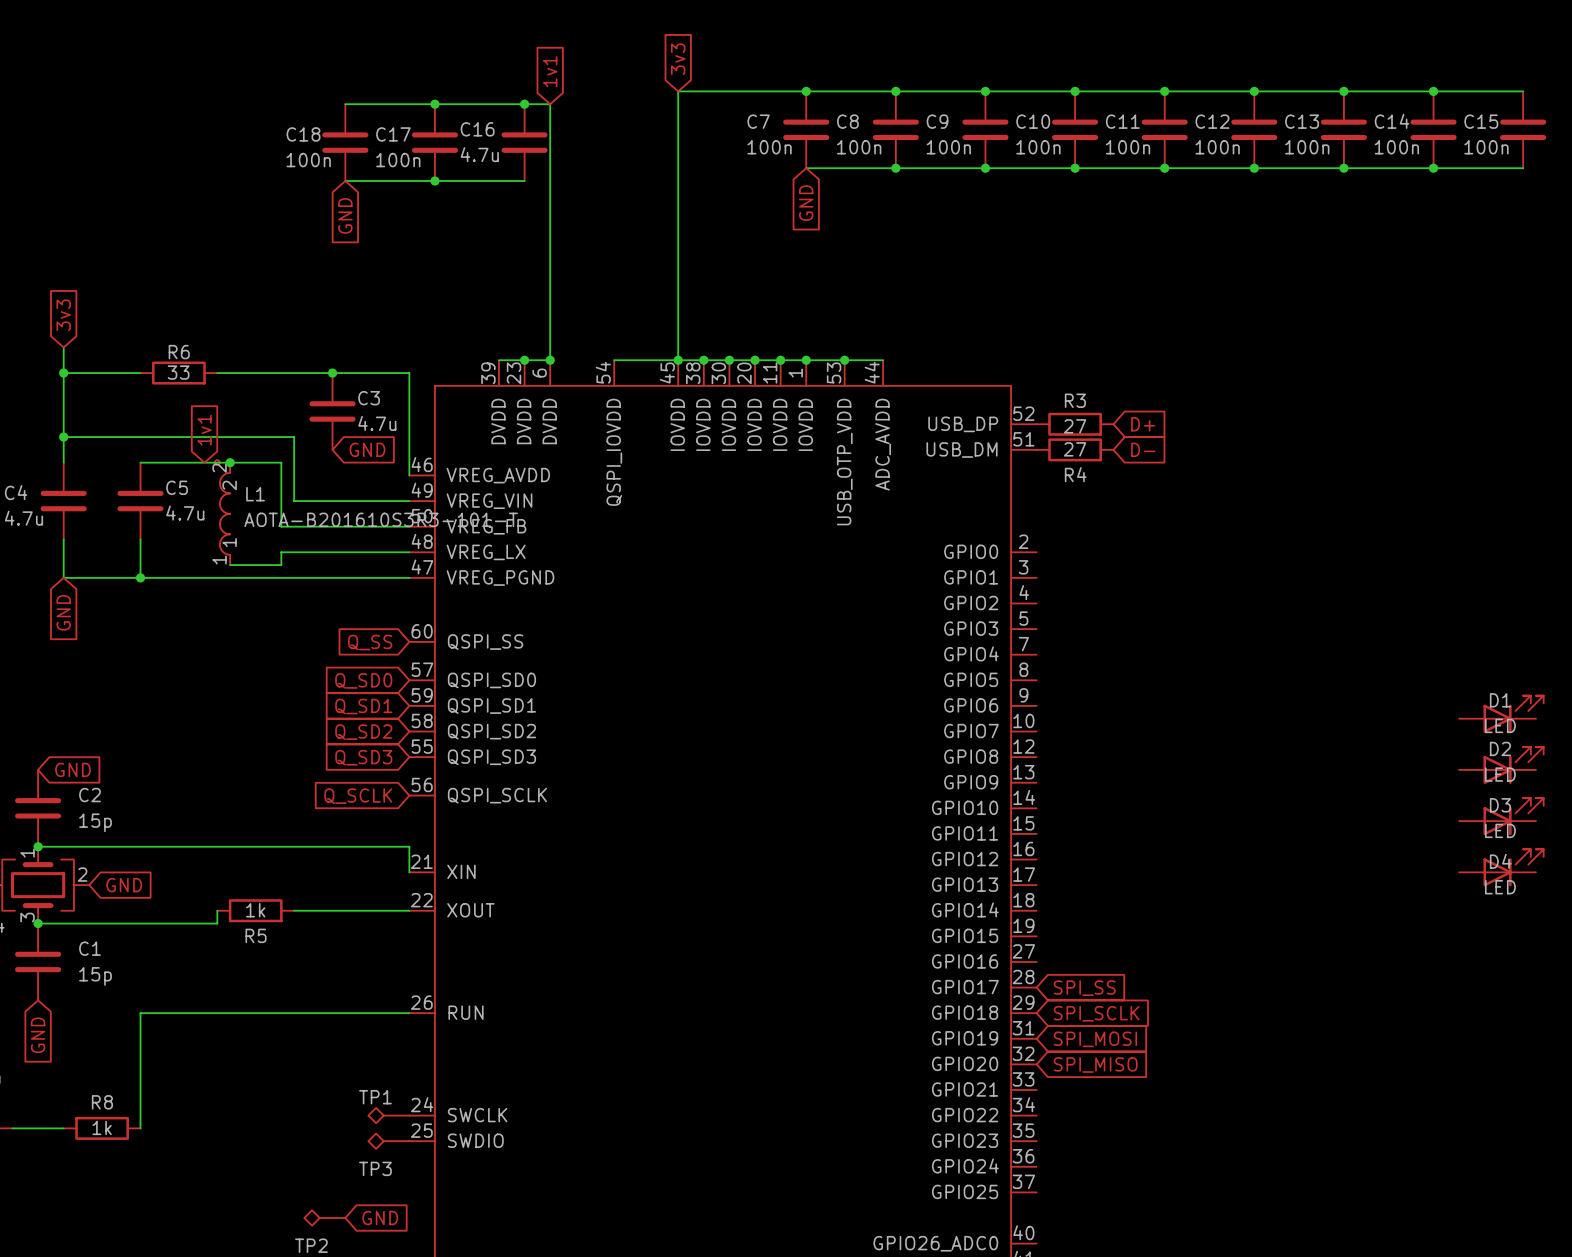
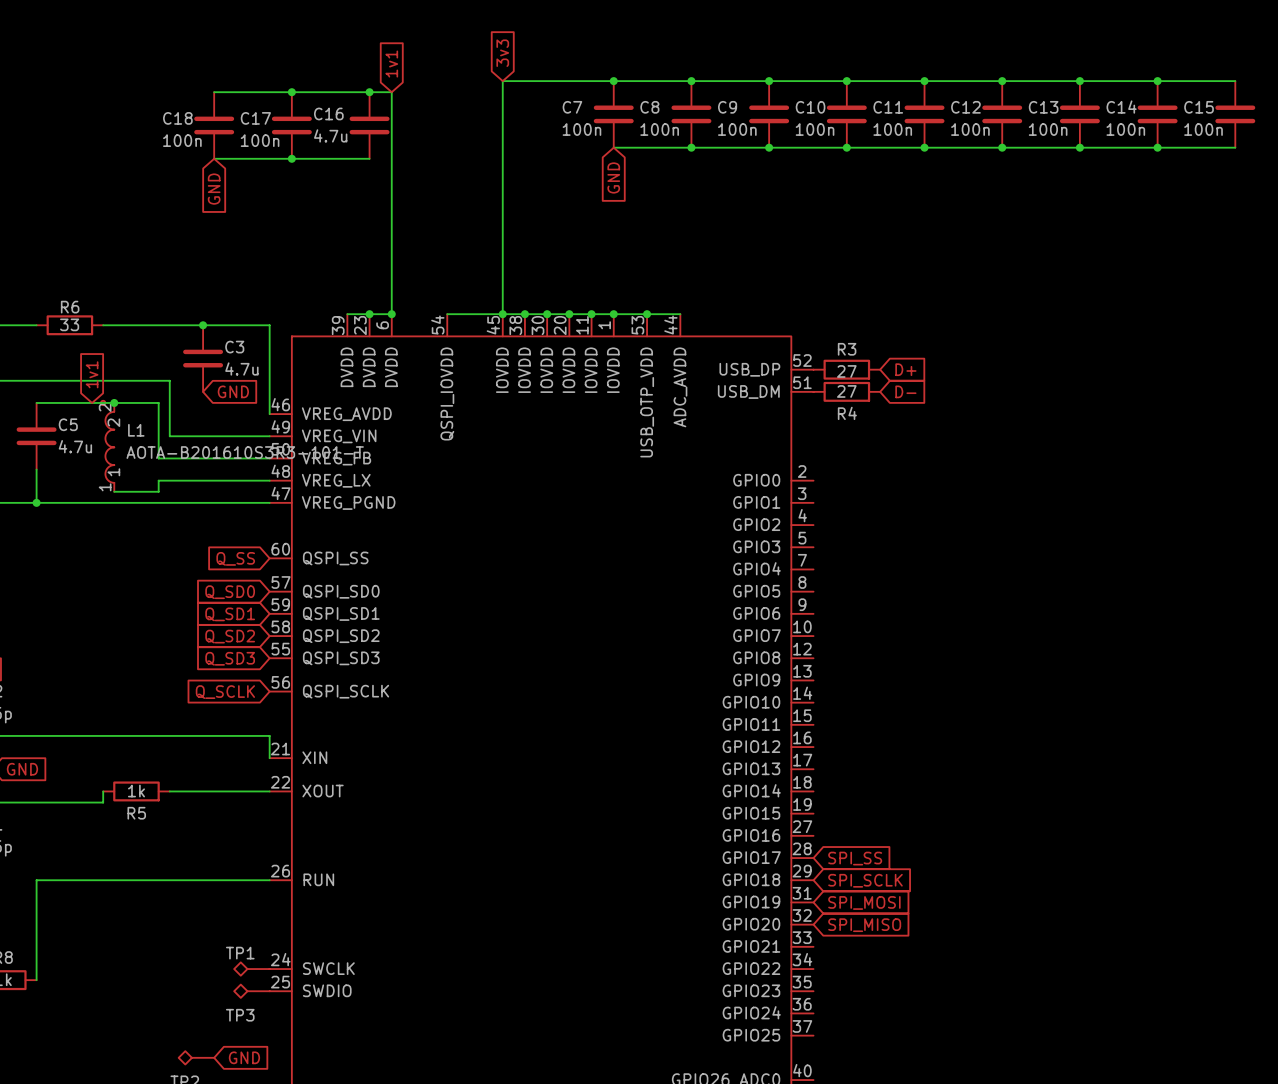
D1: LED (1501, 714) -> none
D2: LED (1501, 765) -> none
D3: LED (1501, 816) -> none
D4: LED (1501, 867) -> none

